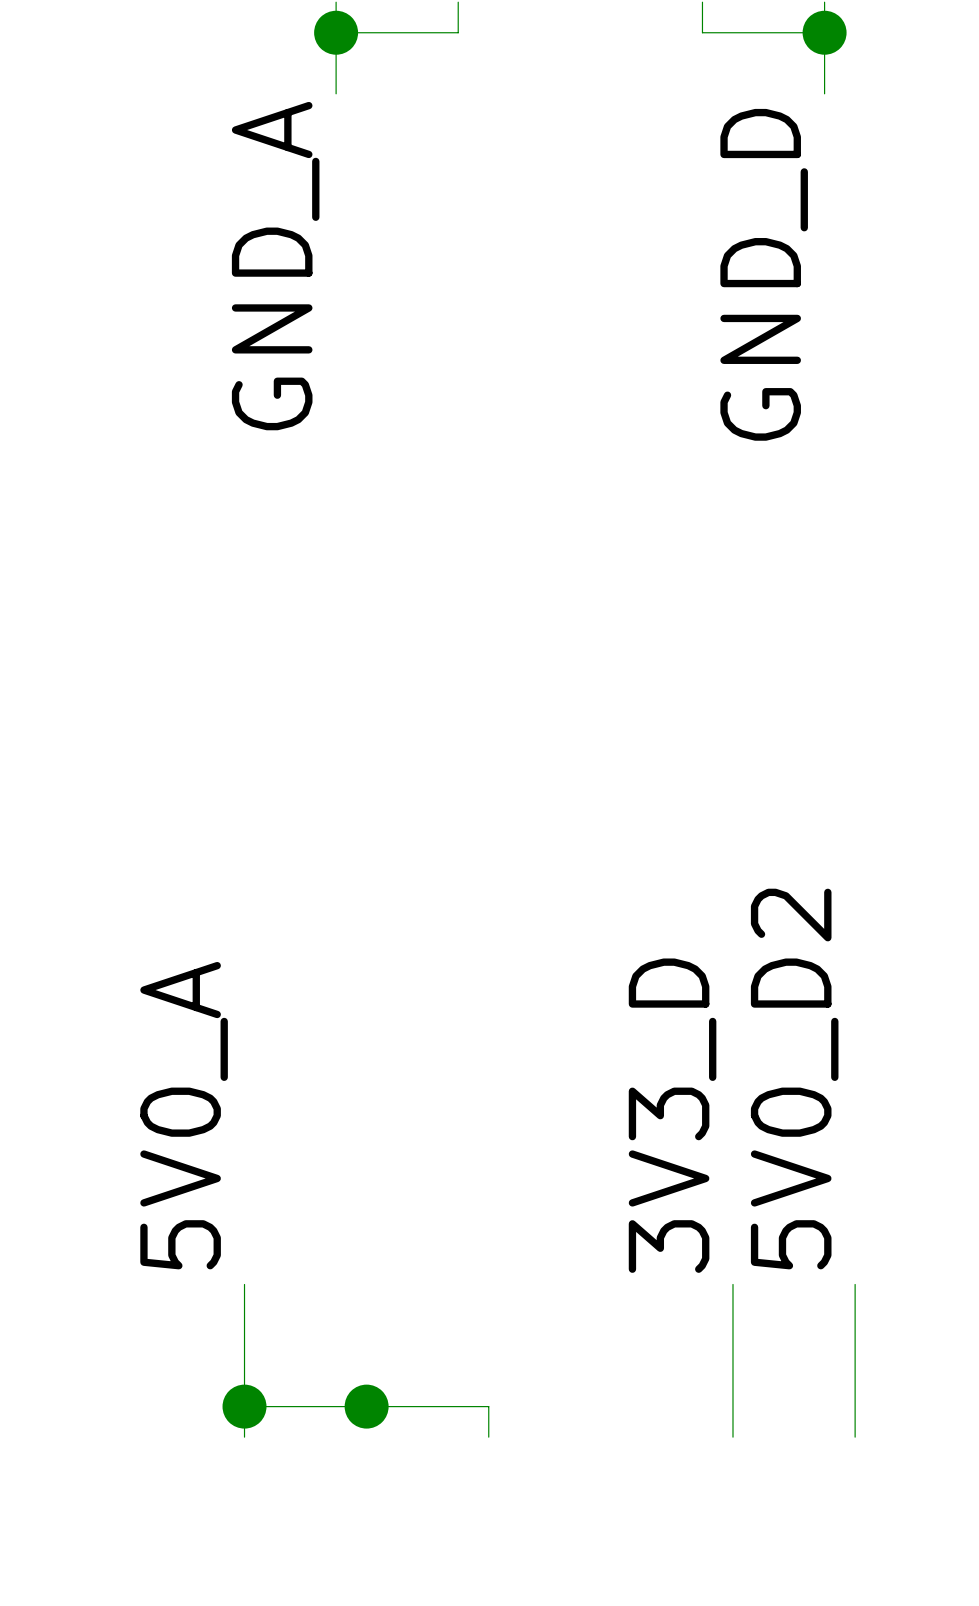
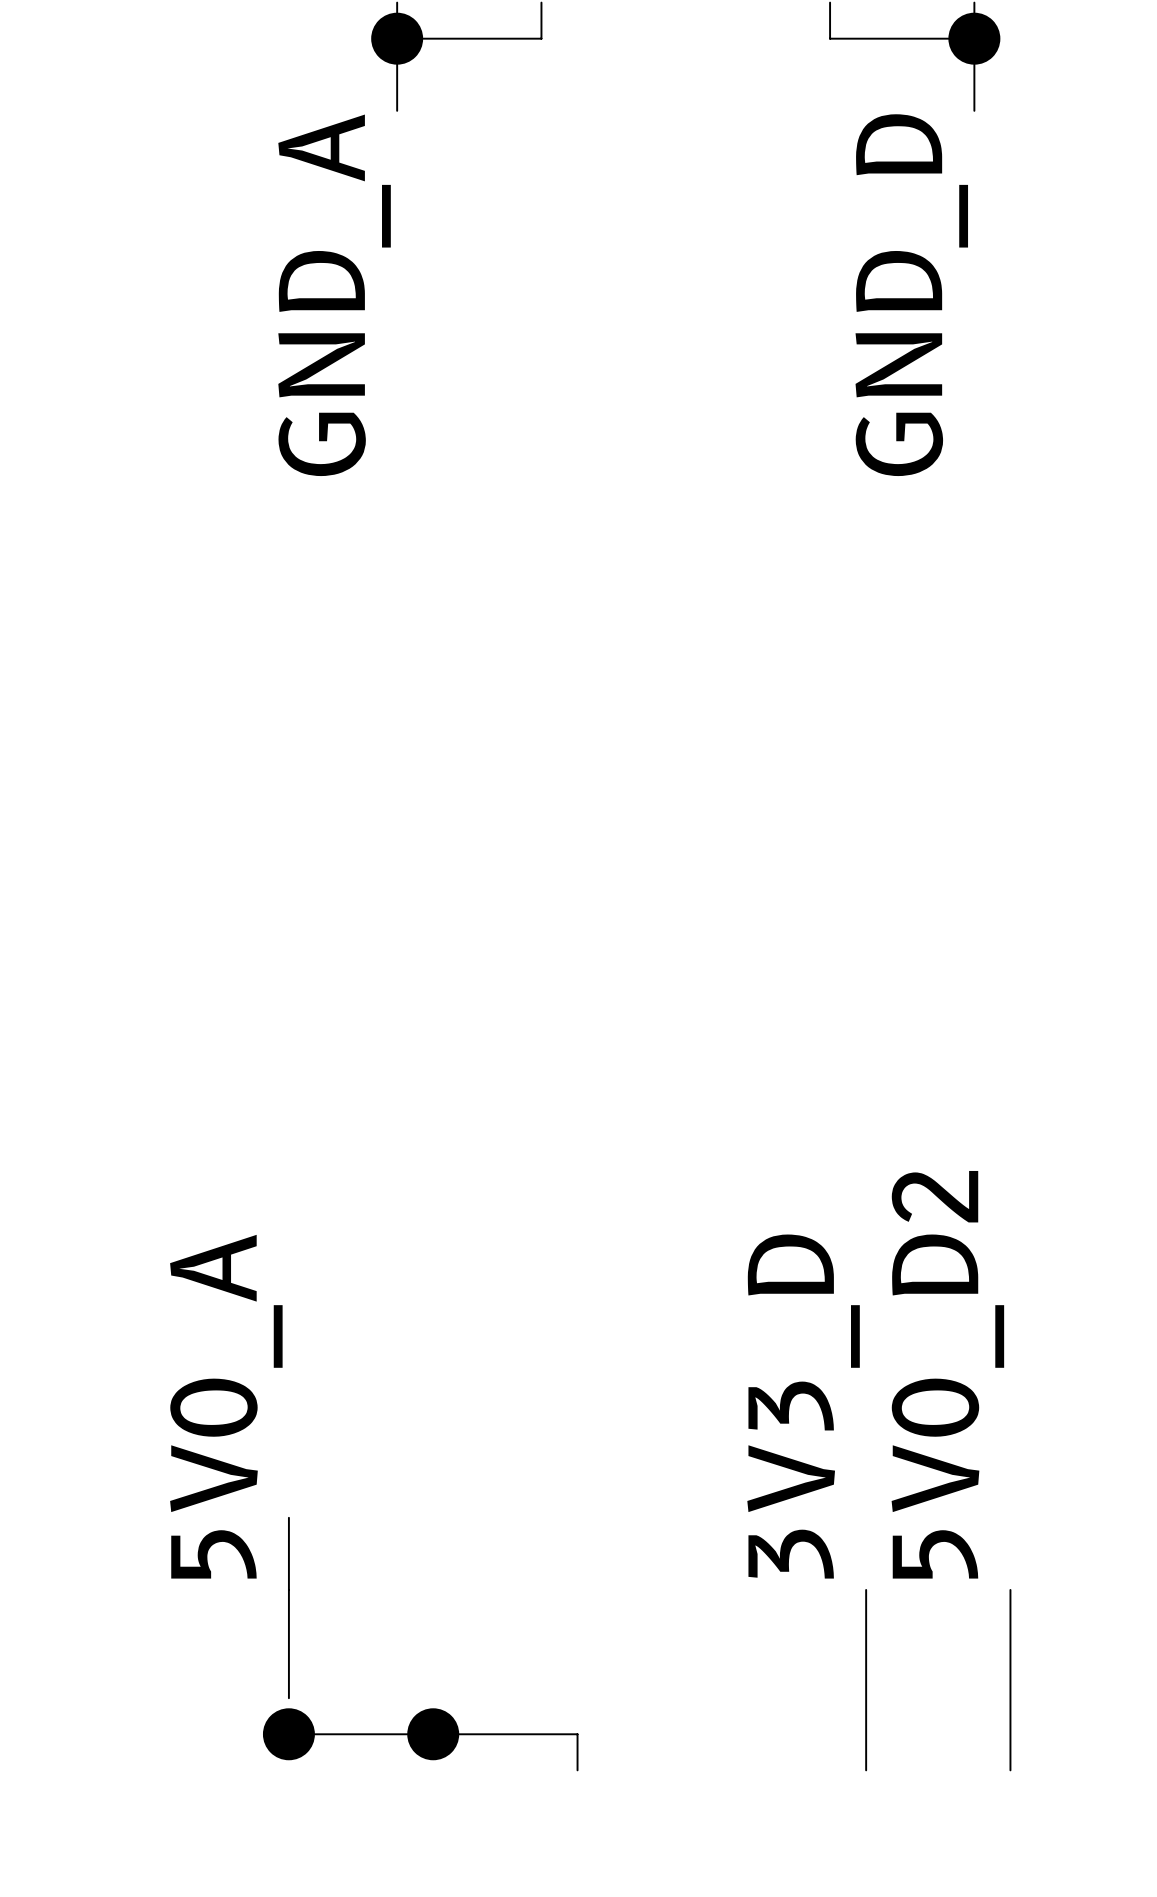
label position: 5V0_D2 (794, 1079) -> 5V0_D2 (947, 1374)
label position: 5V0_A (184, 1115) -> 5V0_A (226, 1406)
label position: 3V3_D (672, 1115) -> 3V3_D (803, 1406)
wire: (732, 1284) (732, 1345) -> (866, 1698) (866, 1770)
wire: (855, 1284) (855, 1345) -> (1010, 1698) (1010, 1770)
wire: (244, 1406) (488, 1406) (488, 1437) -> (288, 1734) (577, 1734) (577, 1770)
junction position: (244, 1406) -> (288, 1734)
junction position: (366, 1406) -> (433, 1734)

